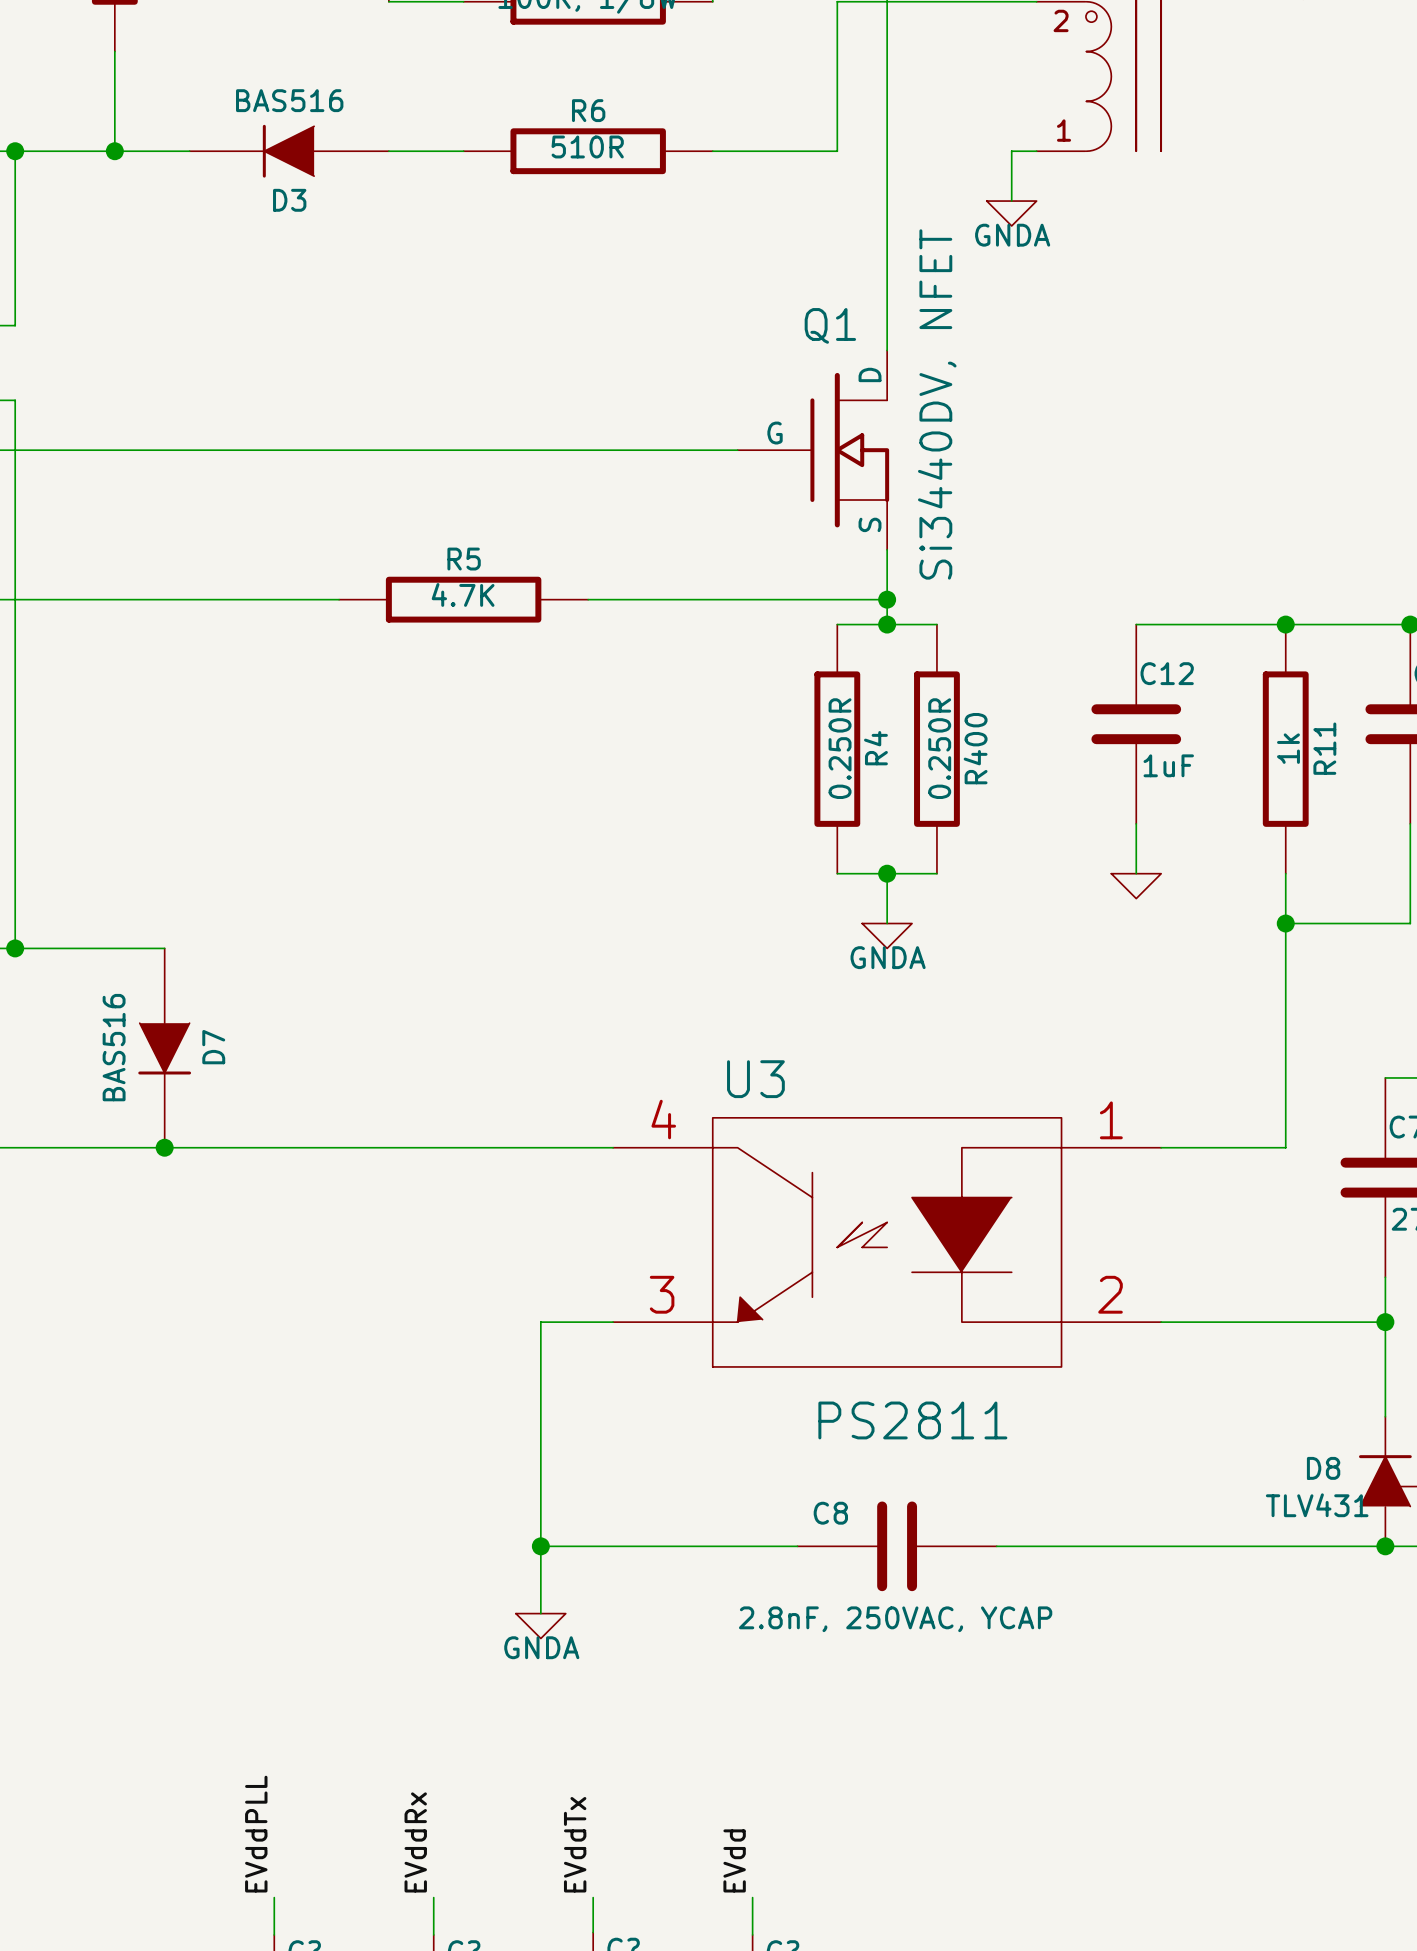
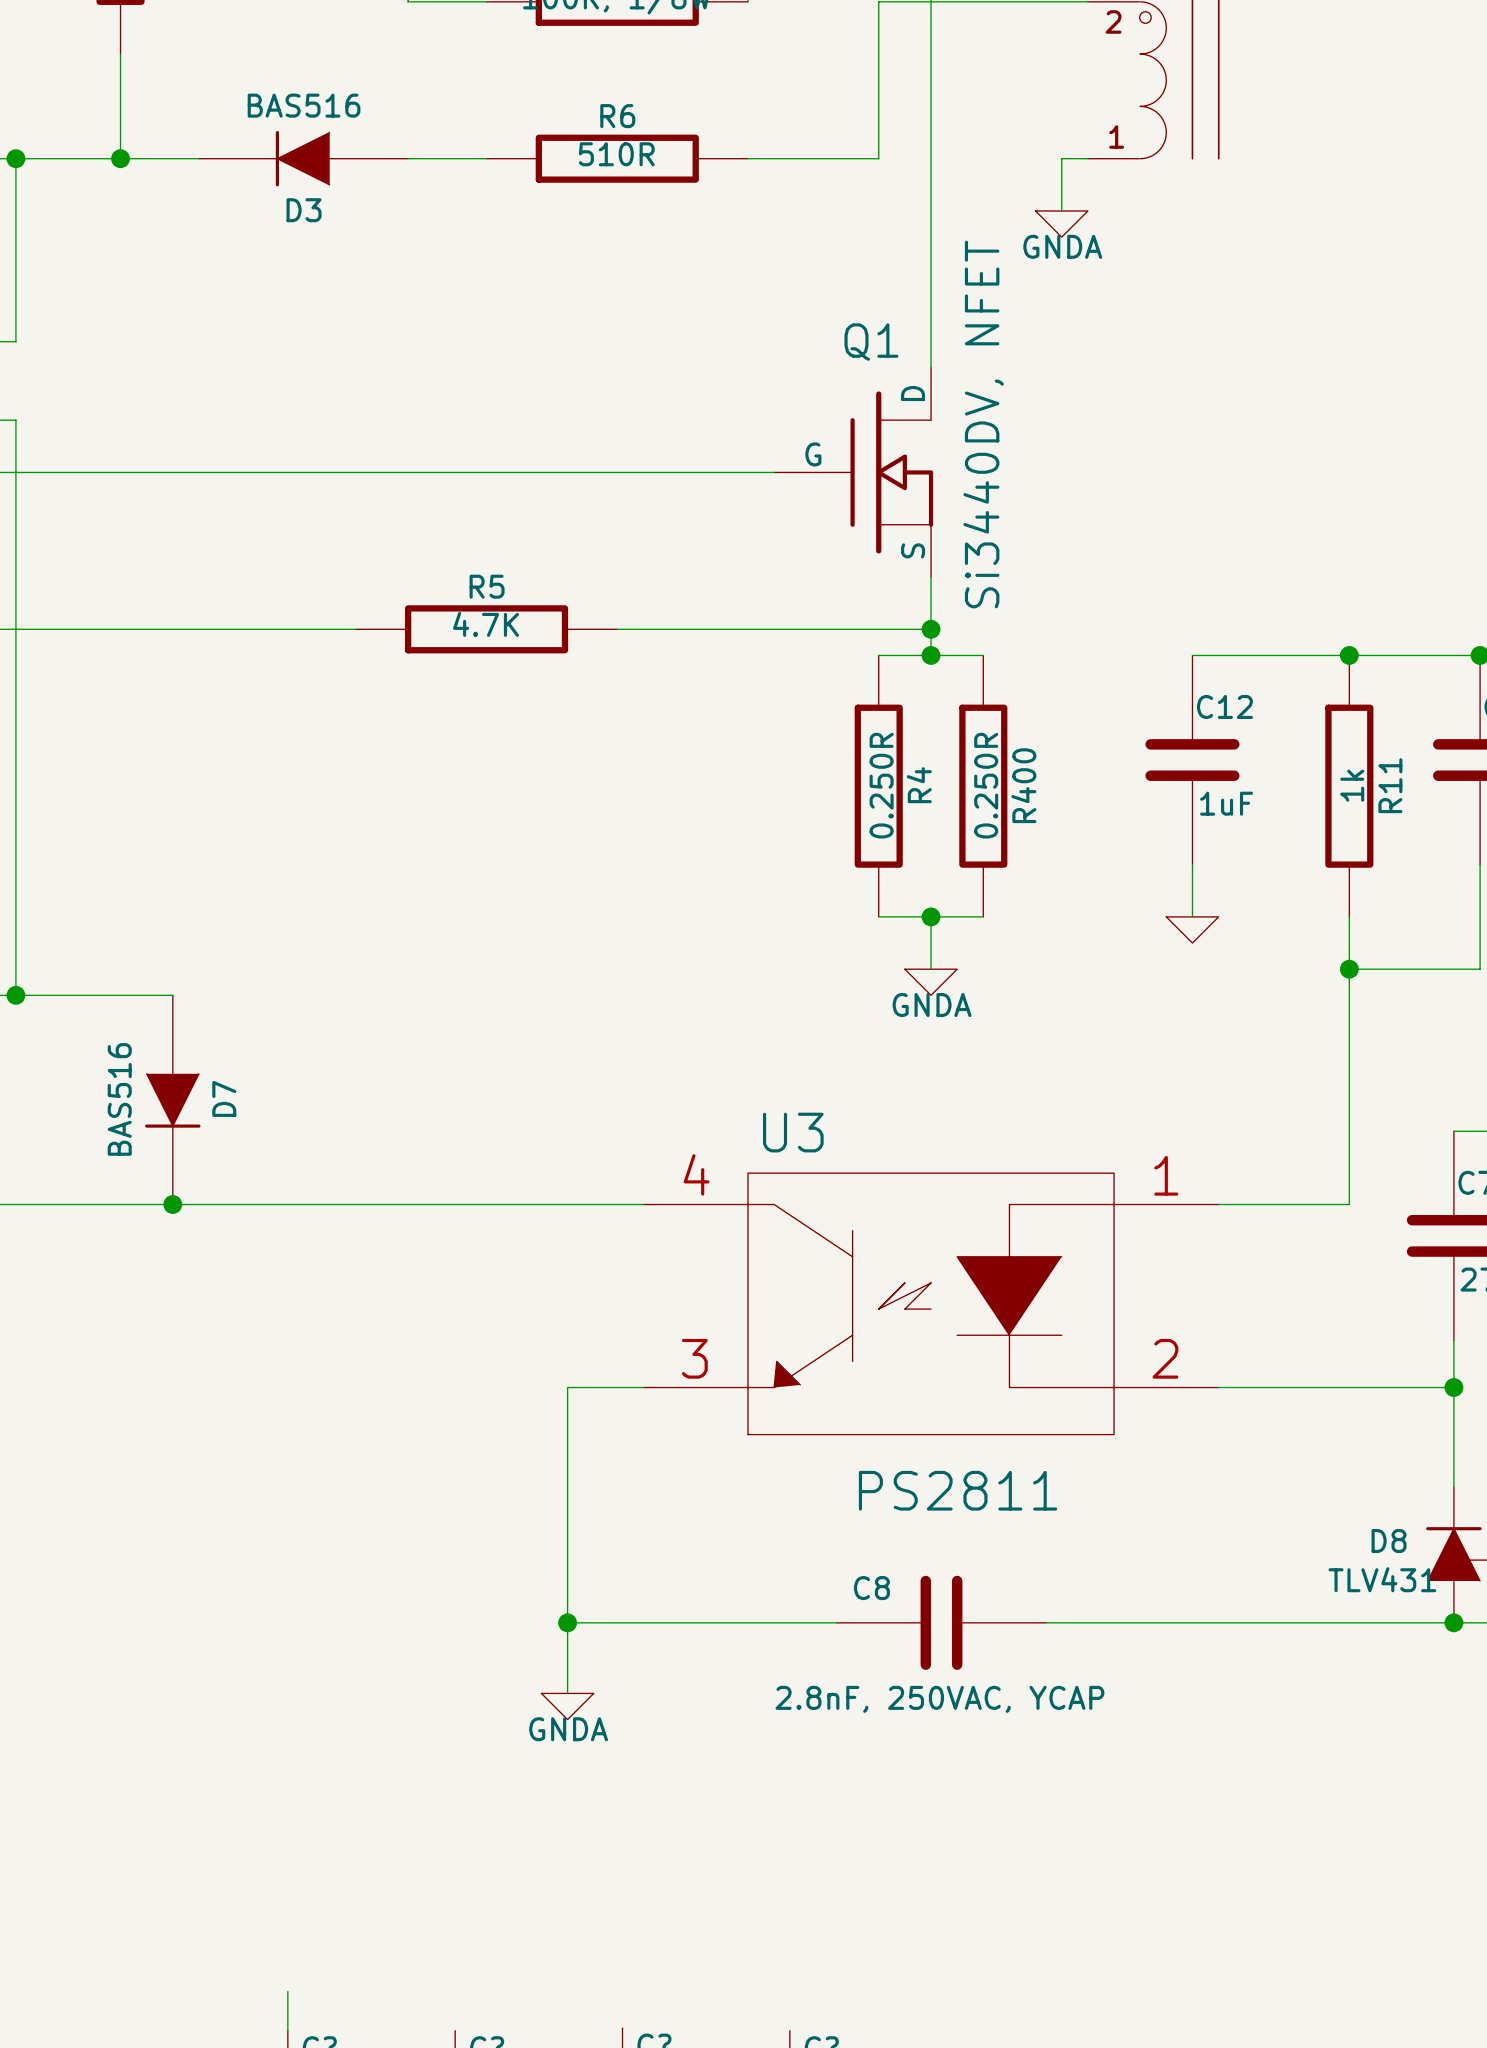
label: EVddPLL (256, 1834) -> none
label: EVddRx (415, 1842) -> none
label: EVddTx (575, 1844) -> none
label: EVdd (734, 1860) -> none
wire: (433, 1897) (433, 1934) -> none
wire: (593, 1897) (593, 1932) -> none
wire: (752, 1897) (752, 1934) -> none

